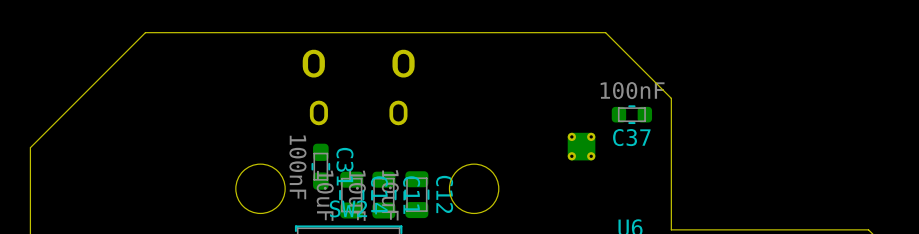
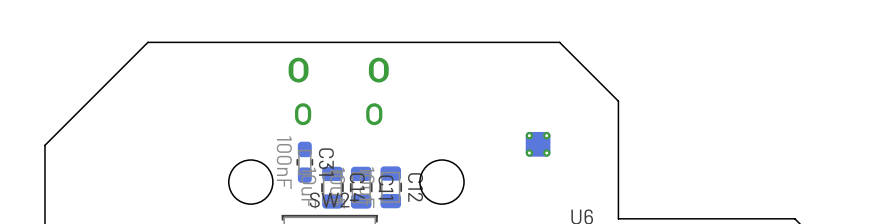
C37: 100nF (631, 114) -> none

